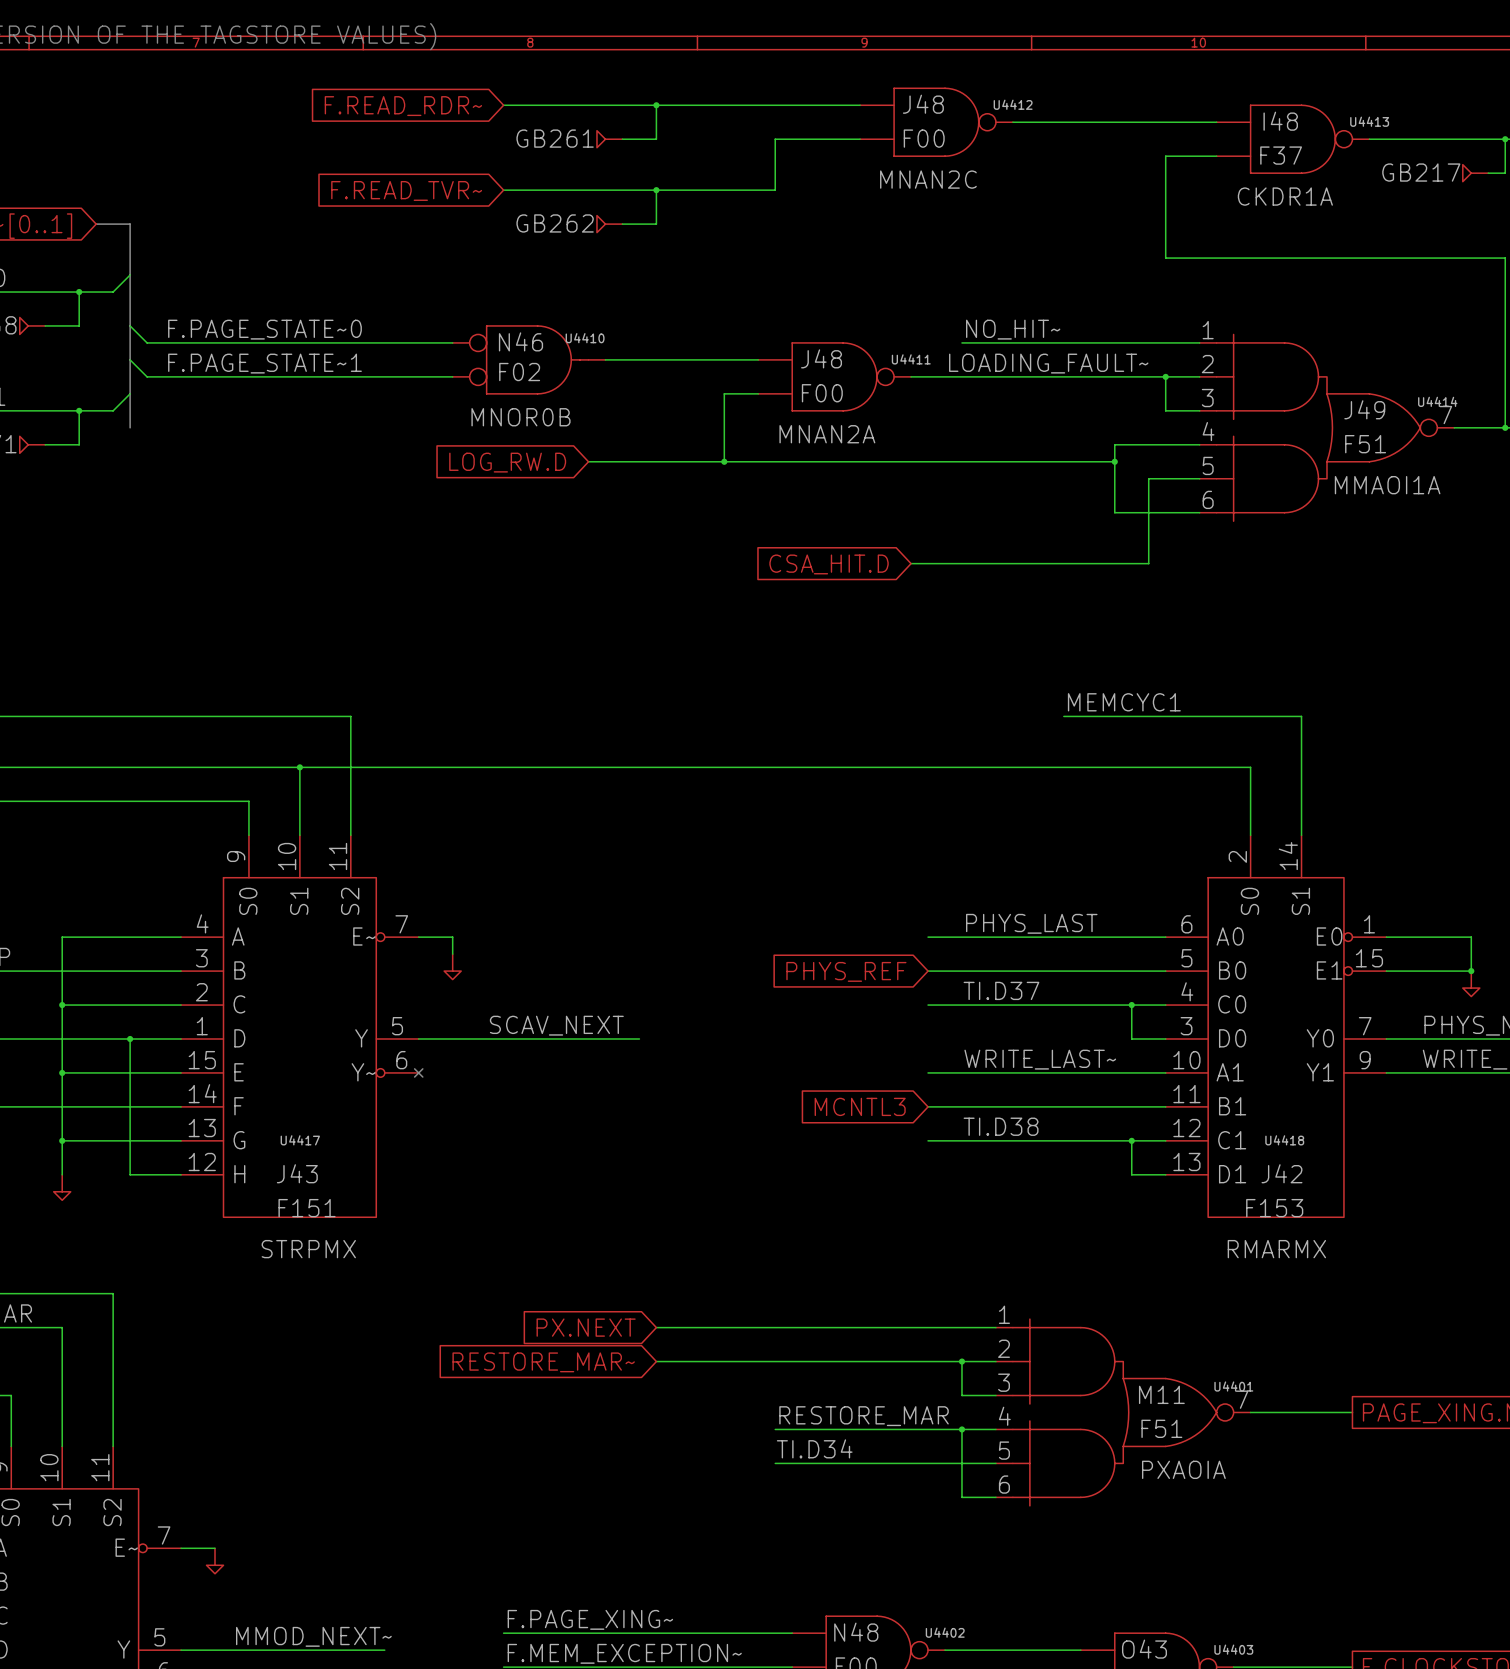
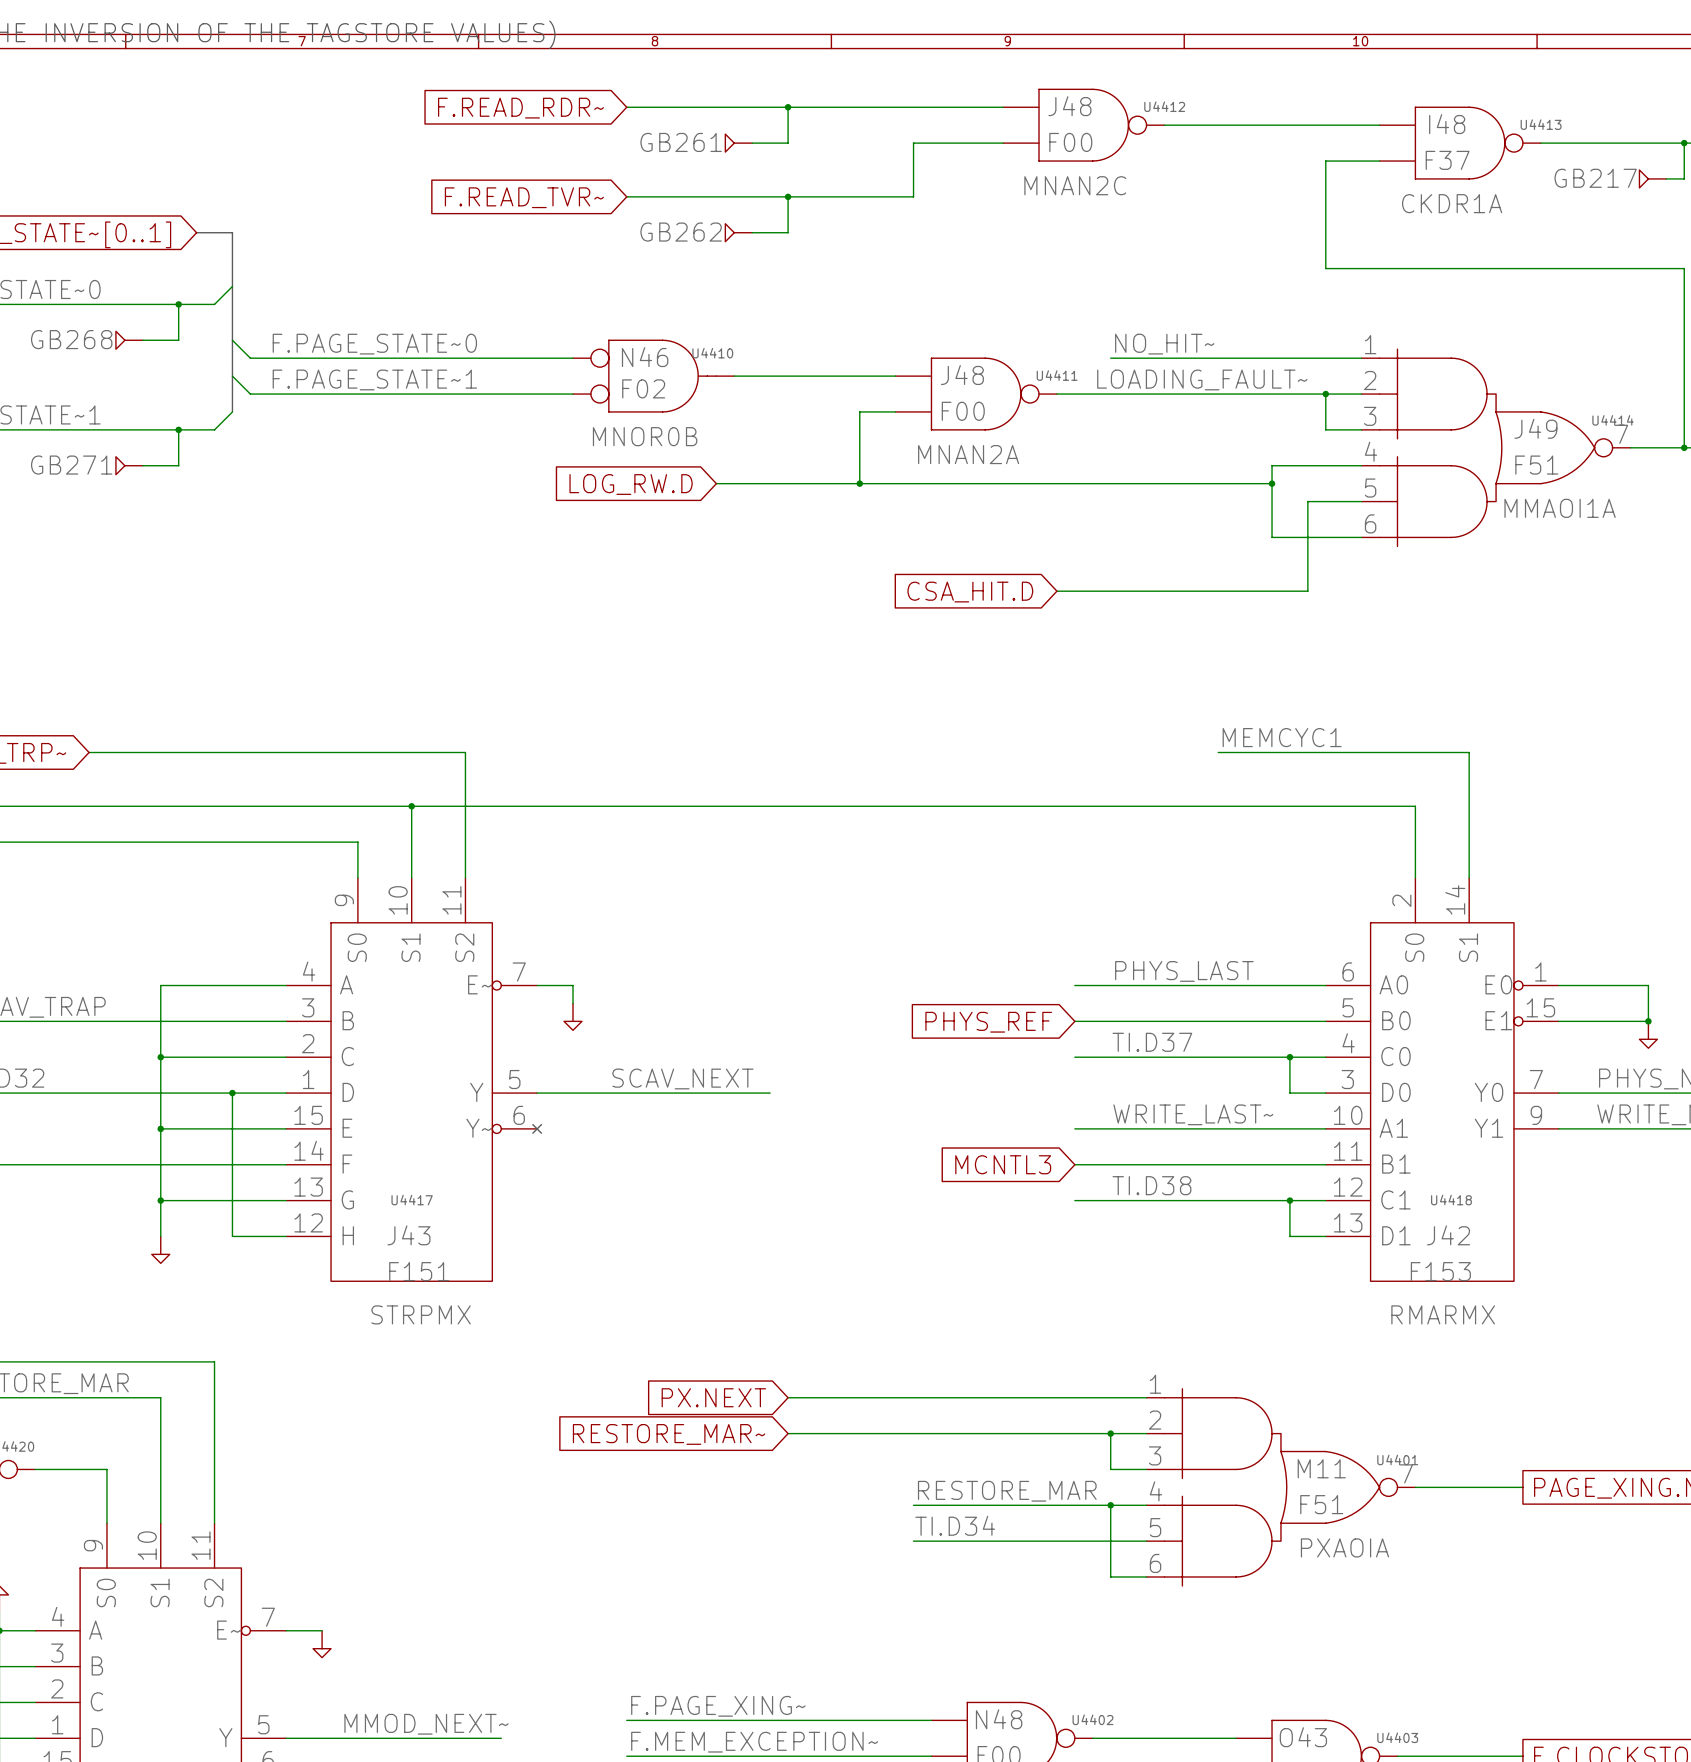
bus: (130, 393) (130, 427) -> none

